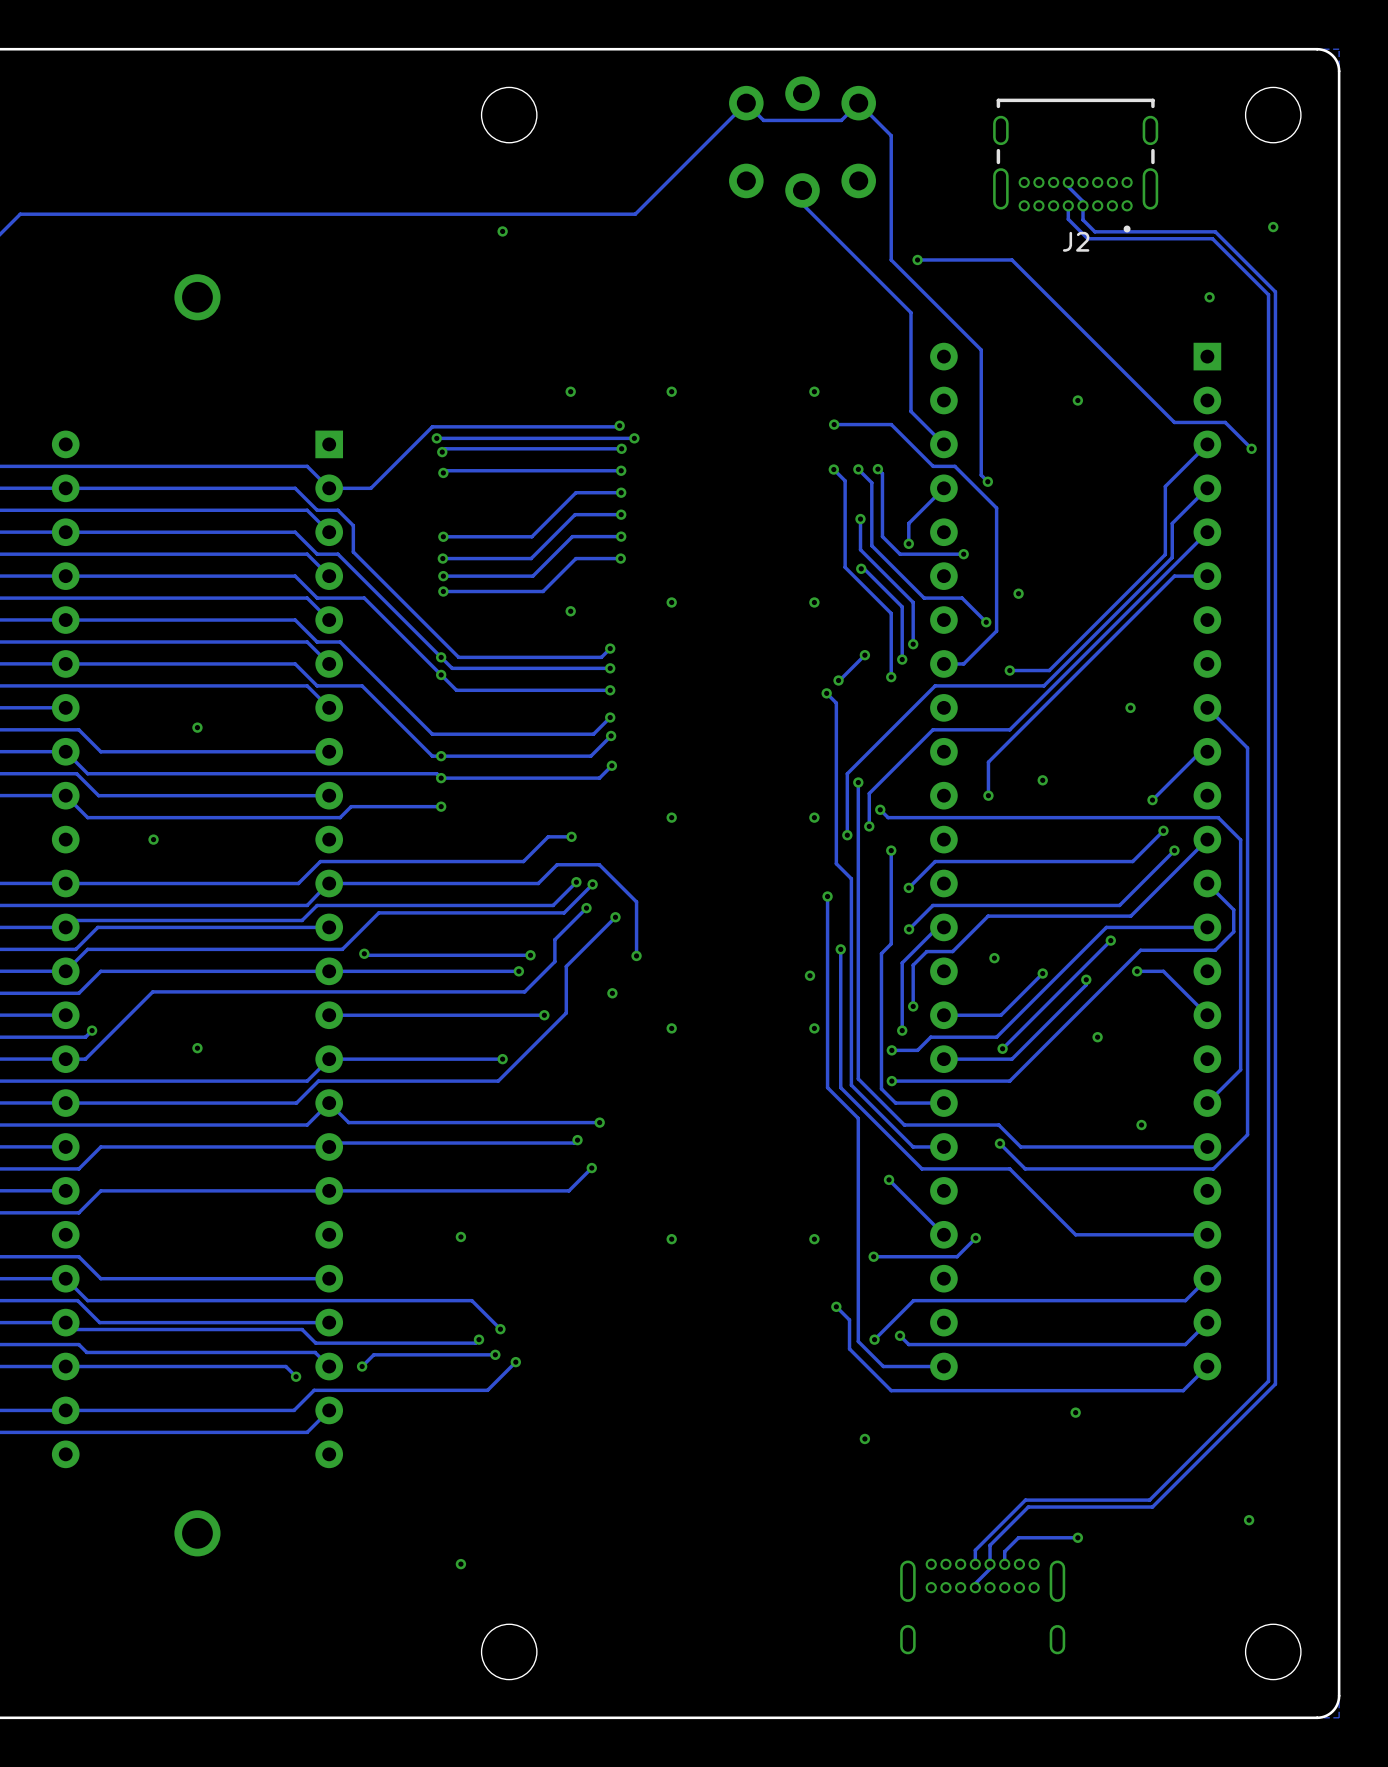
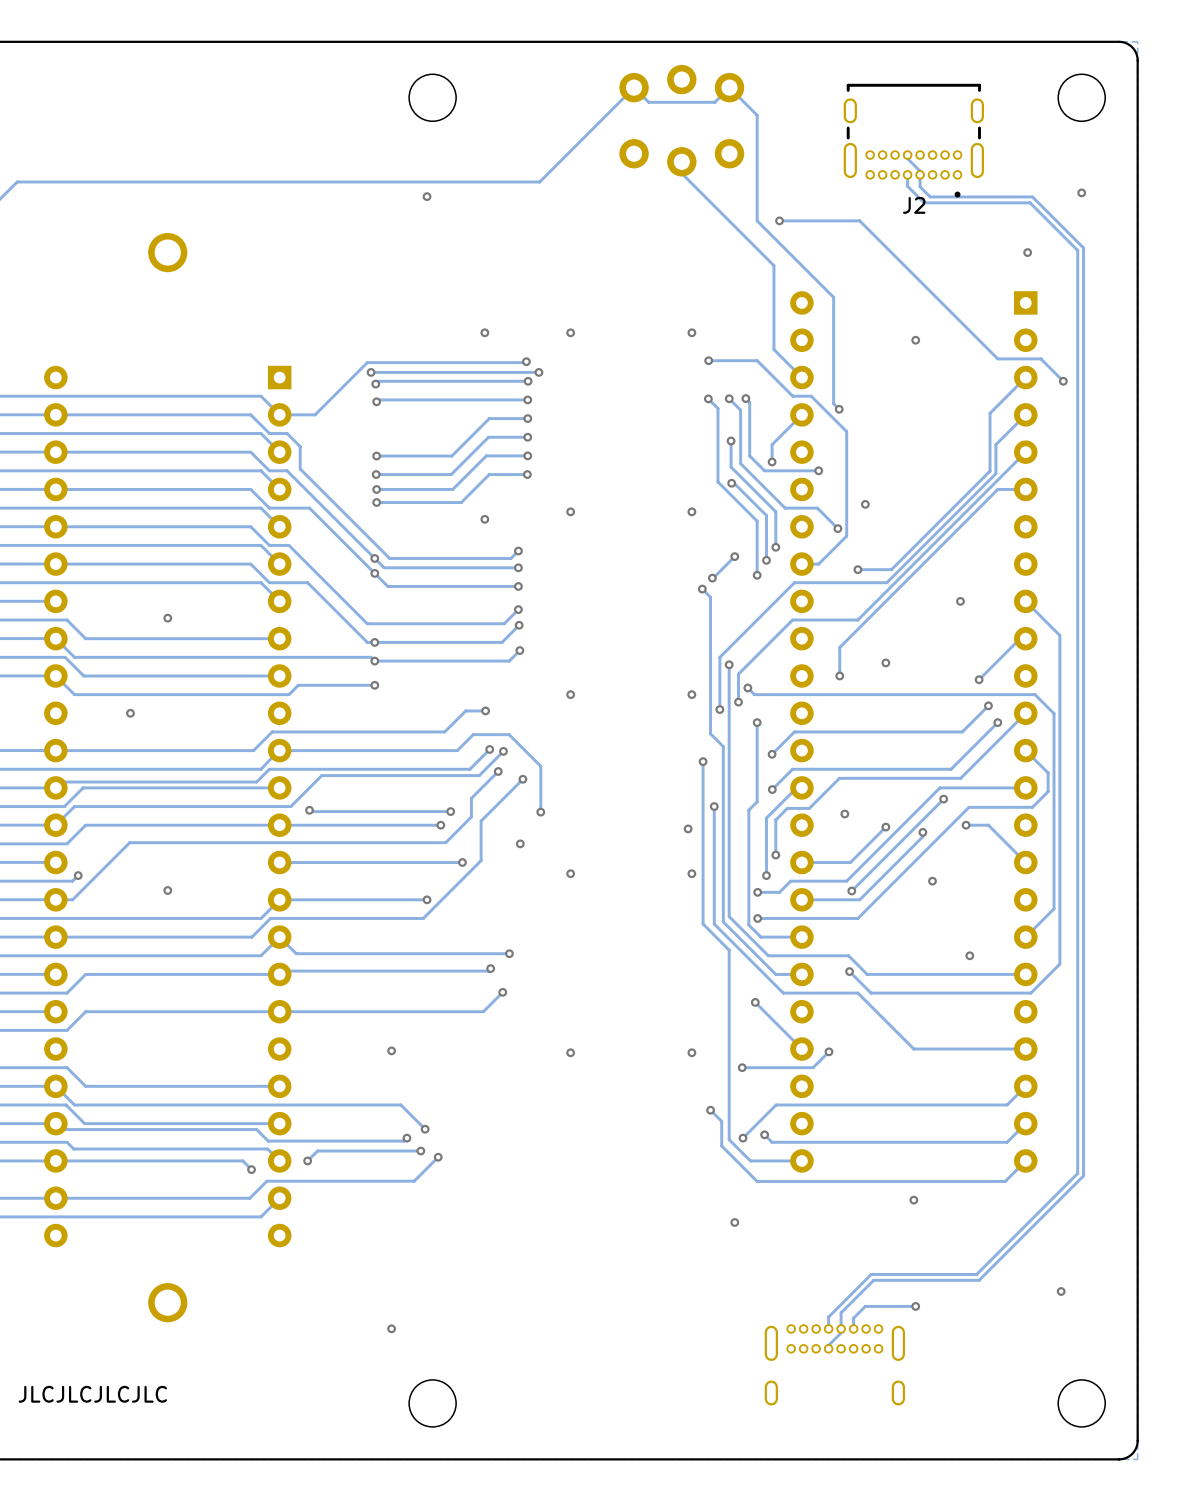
text: none -> JLCJLCJLCJLC (92, 1394)

